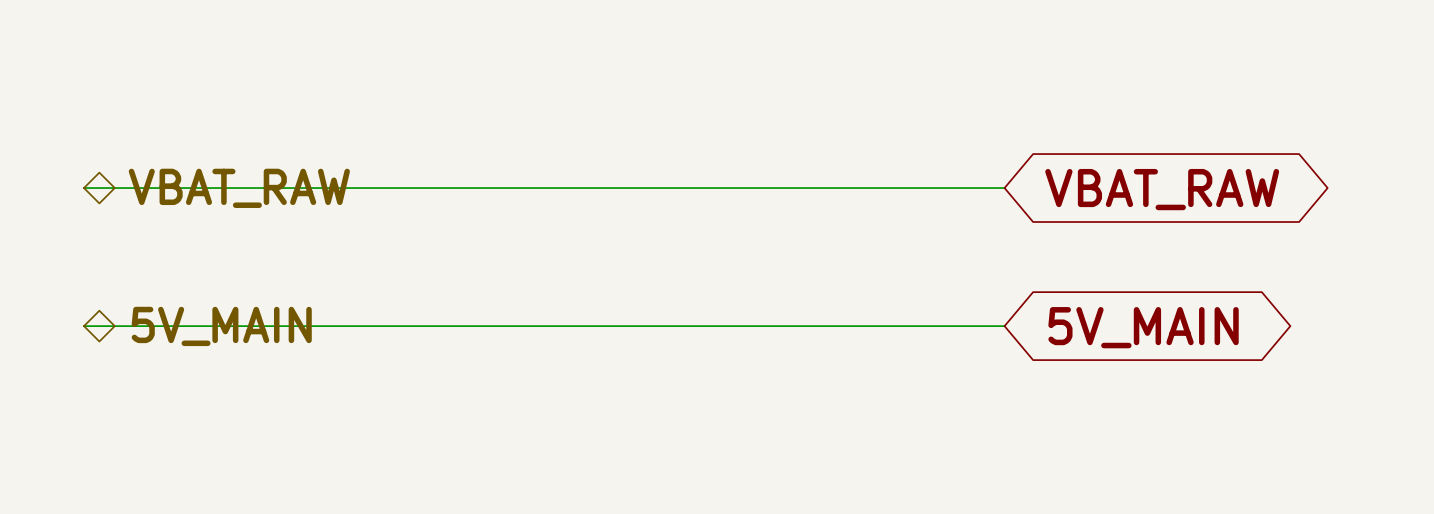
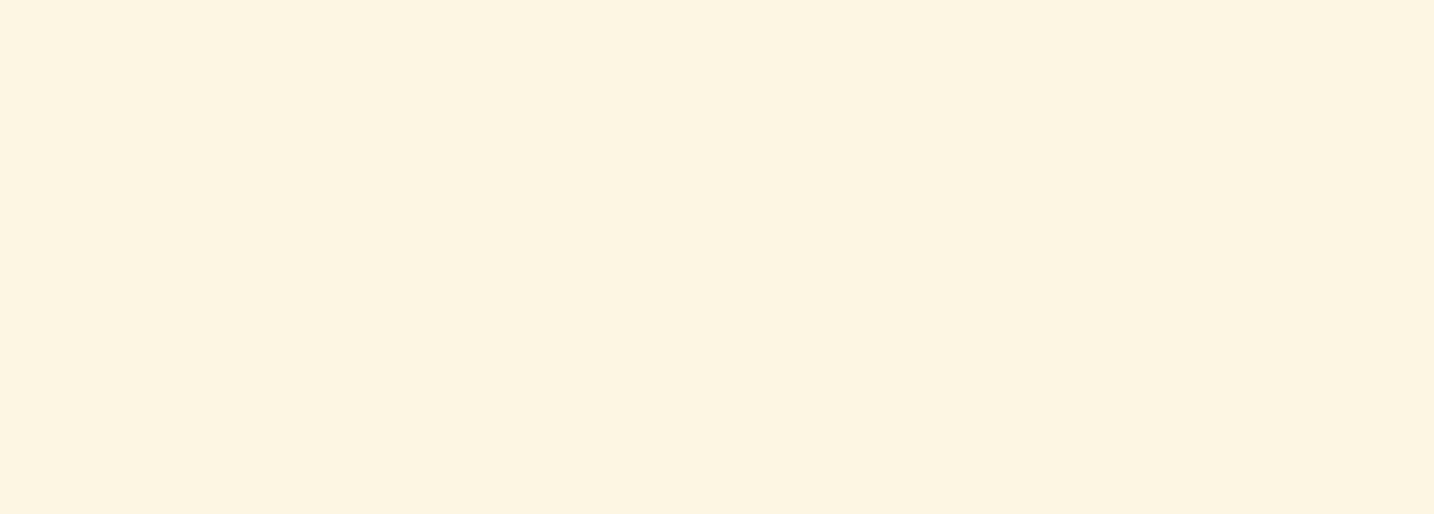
wire: (83, 188) (1004, 188) -> none
hierarchical label: VBAT_RAW (239, 188) -> none
global label: VBAT_RAW (1162, 189) -> none
wire: (83, 326) (1004, 326) -> none
hierarchical label: 5V_MAIN (221, 326) -> none
global label: 5V_MAIN (1143, 327) -> none

